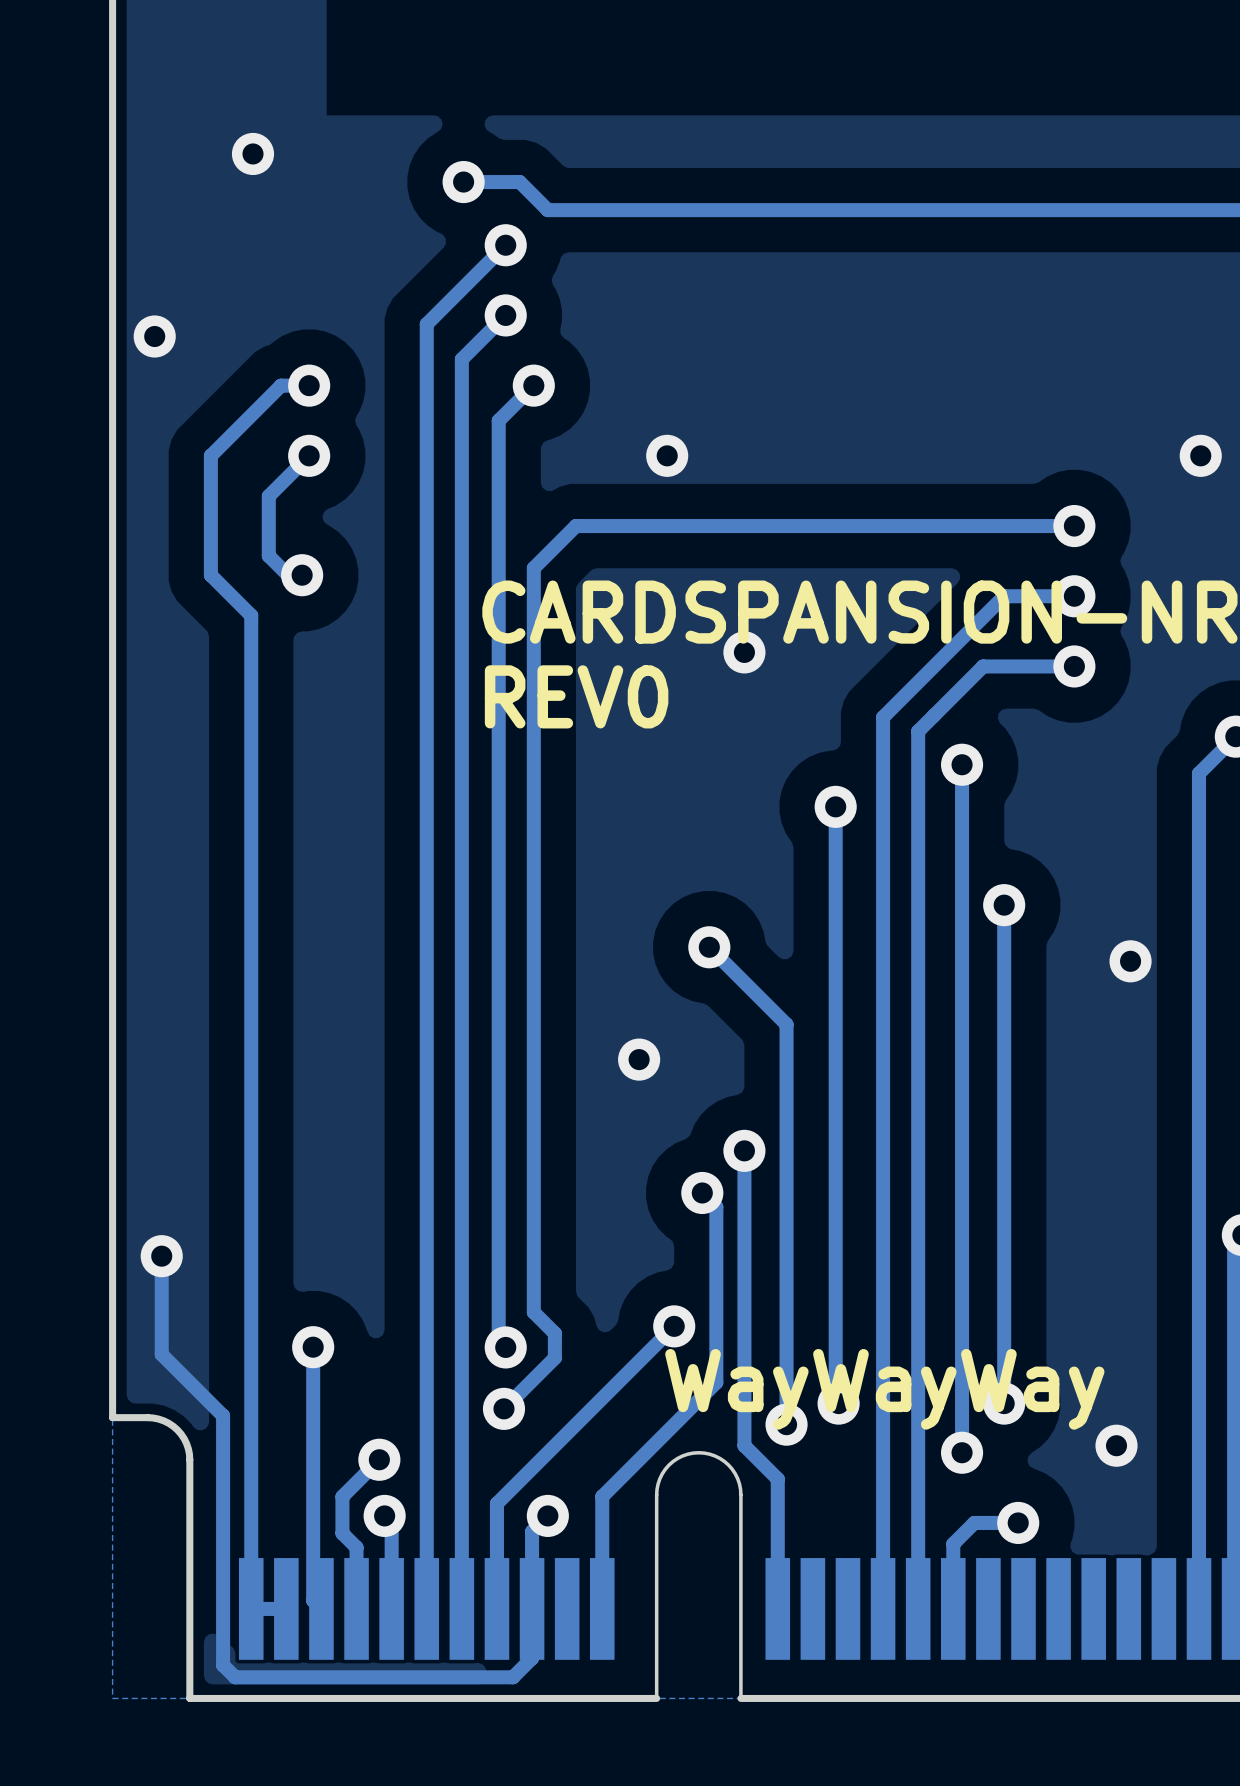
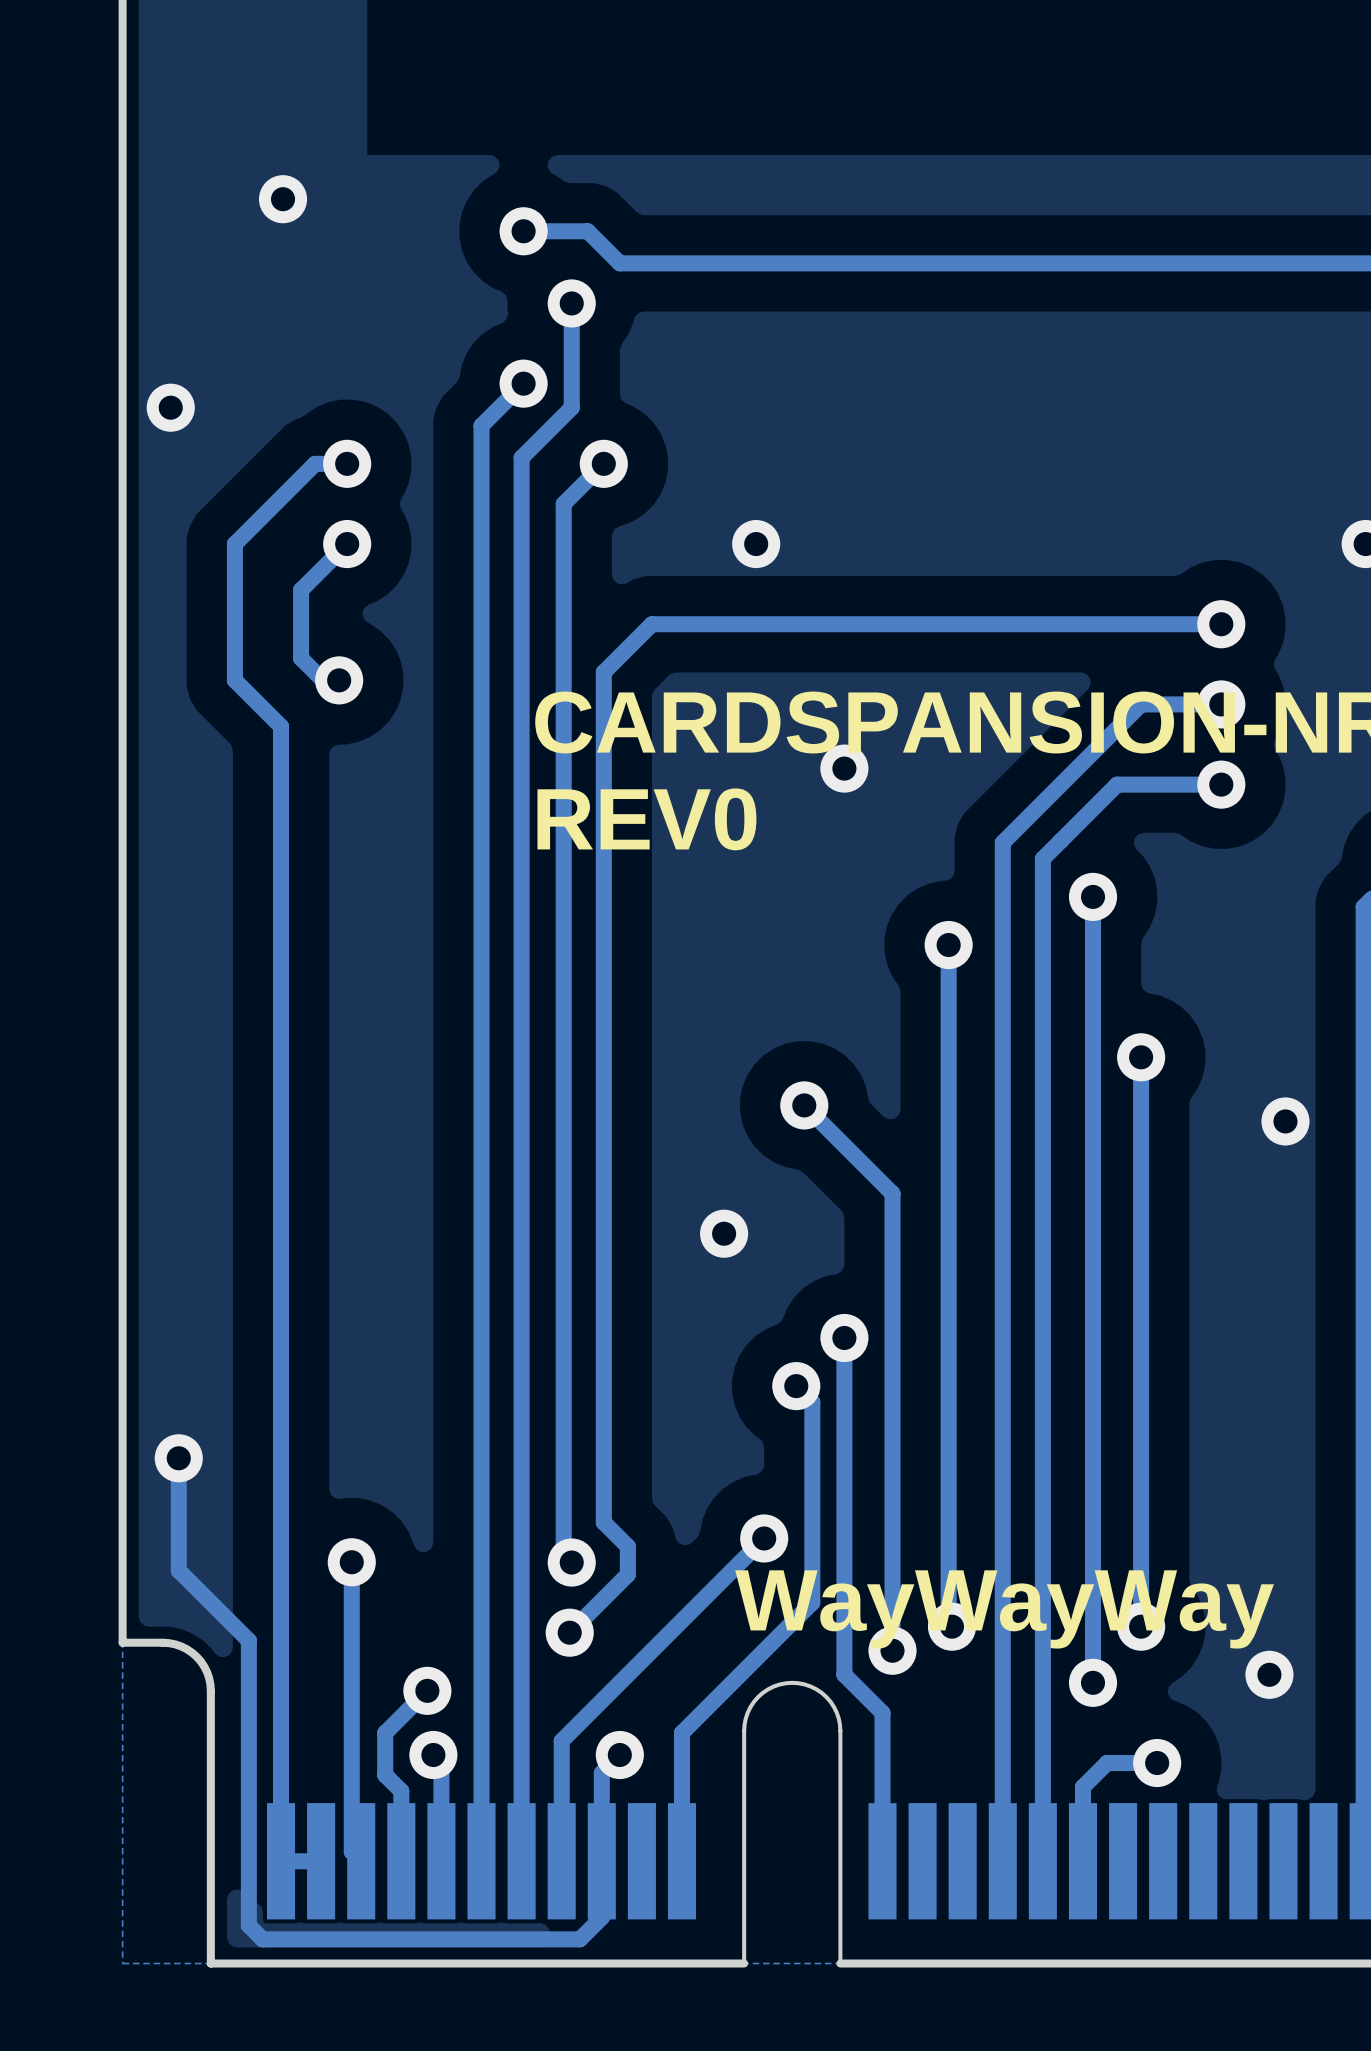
track: (505, 245) (426, 324) (426, 352) -> (571, 303) (571, 407) (521, 457)
track: none -> (523, 383) (481, 425)
track: (505, 315) (461, 359) (461, 380) -> none
via position: (505, 315) -> (523, 383)

